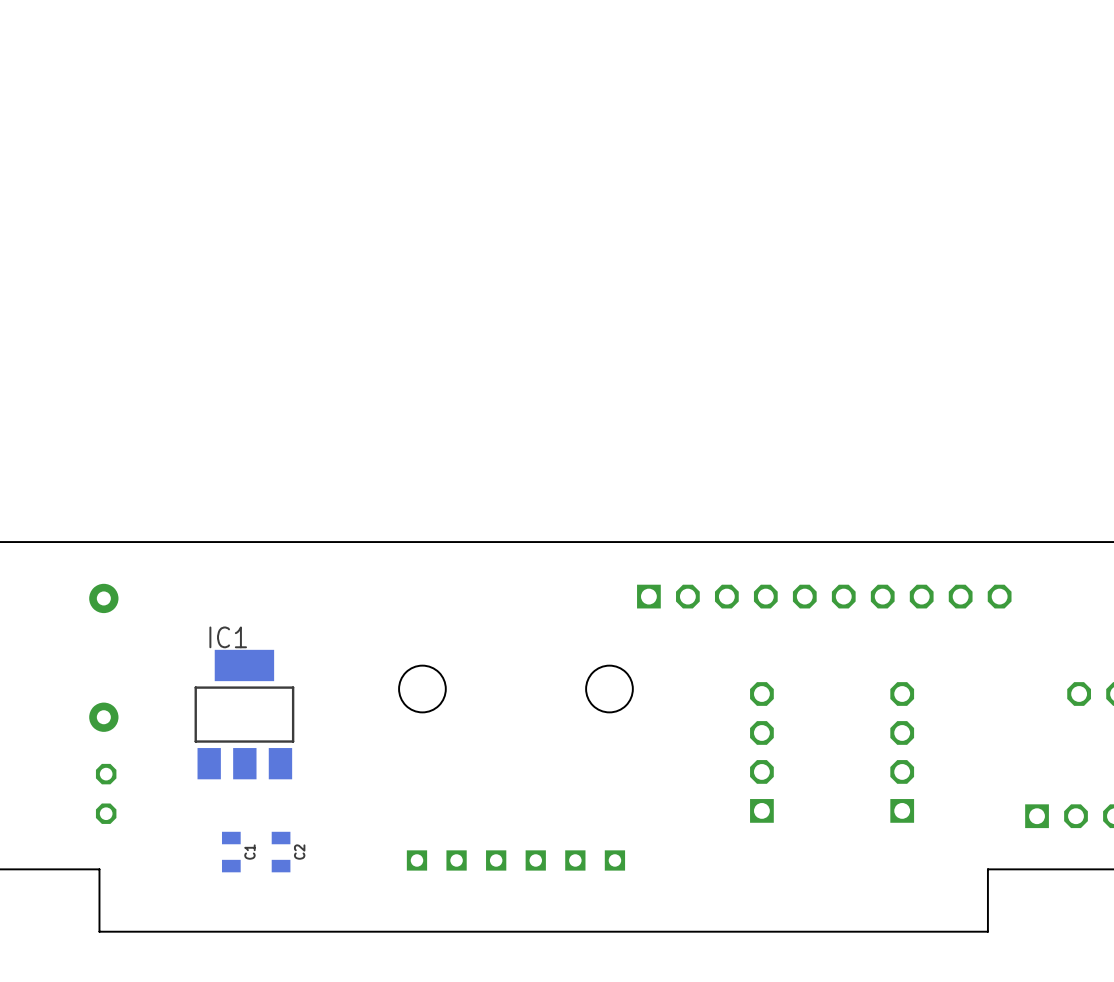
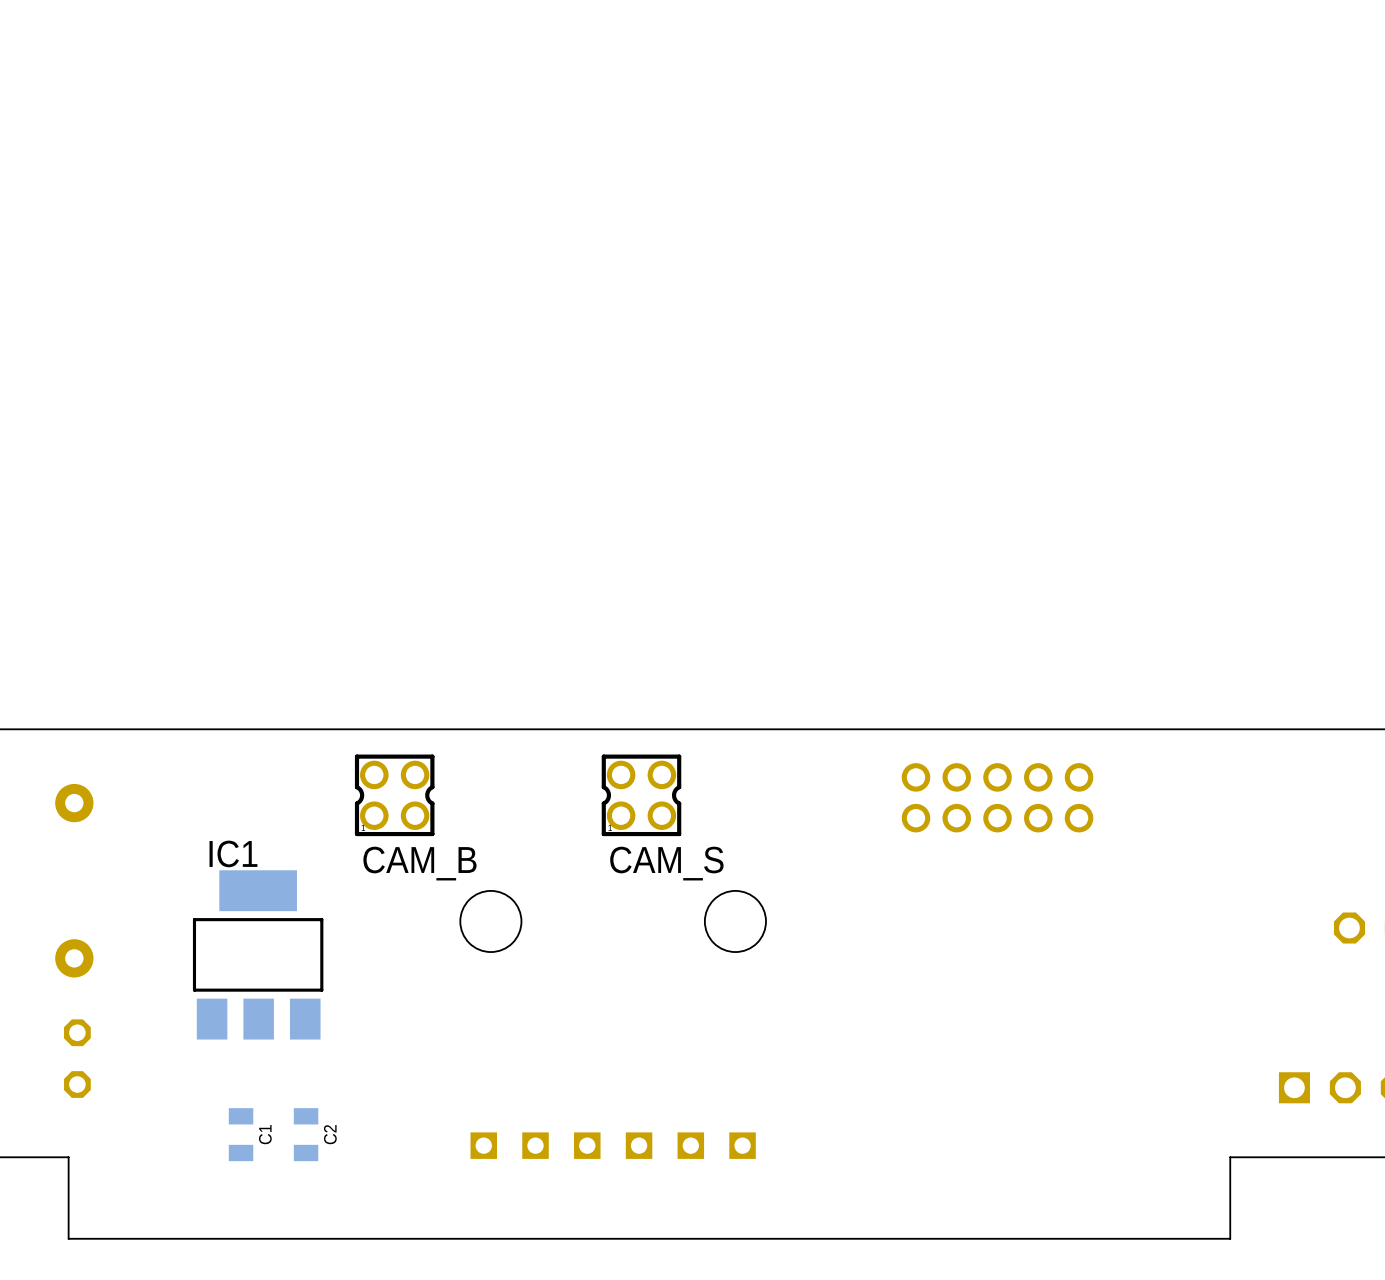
part footprint: [637, 584, 1012, 609] -> [901, 763, 1094, 833]
CAM_B: none -> (394, 795)
CAM_S: none -> (641, 795)
part: (761, 752) -> none
part: (902, 752) -> none

